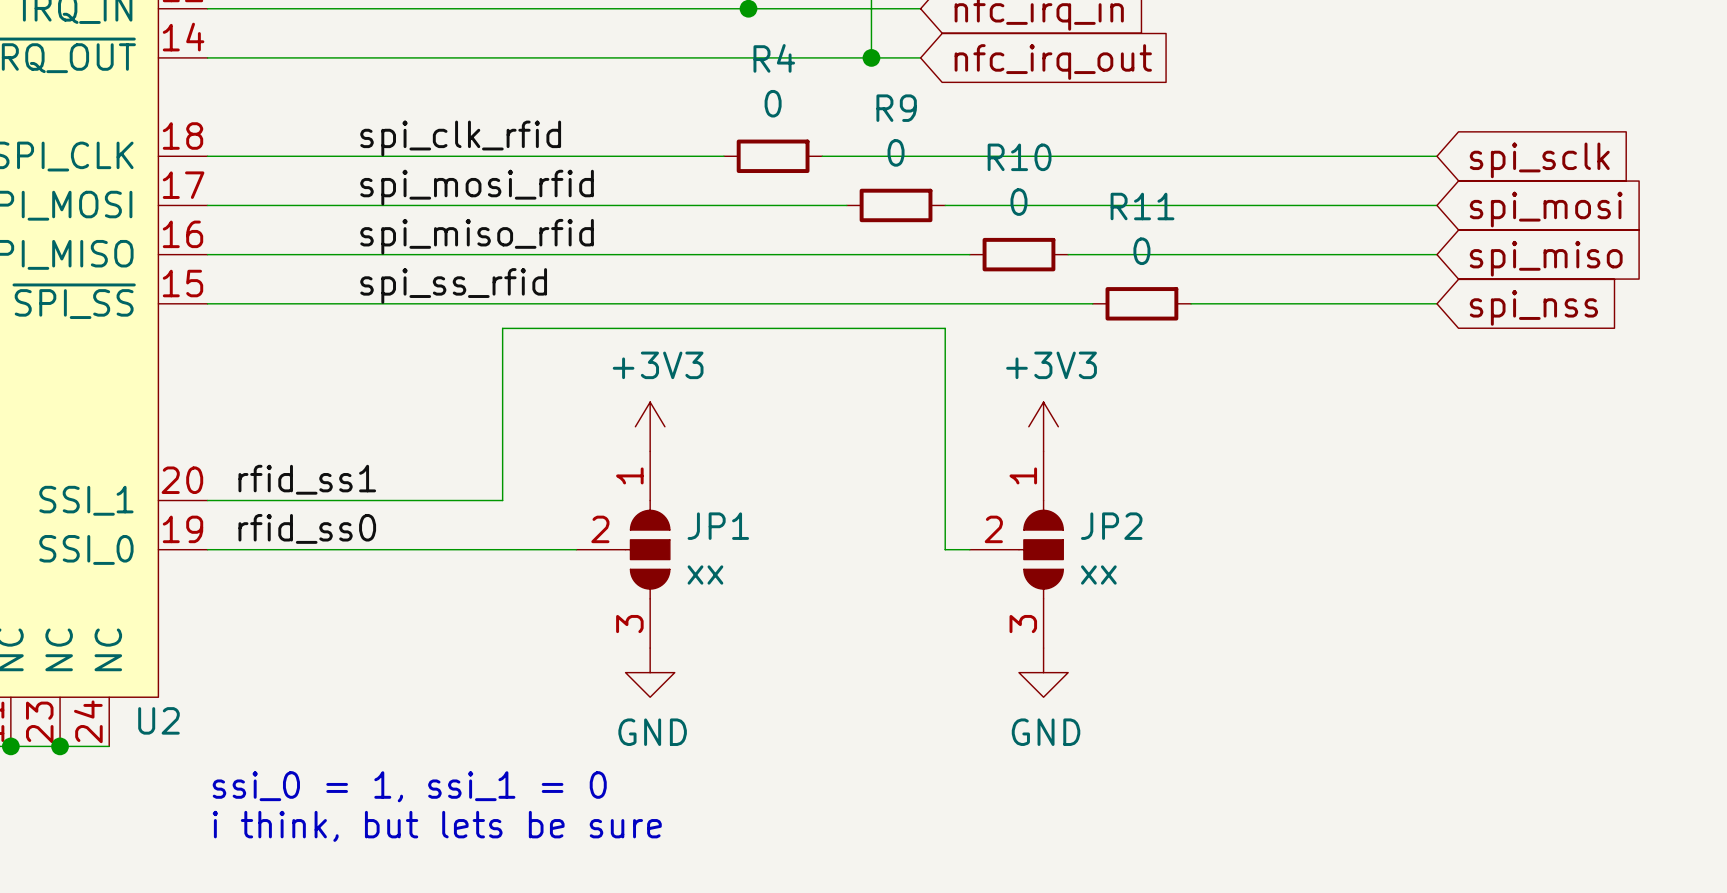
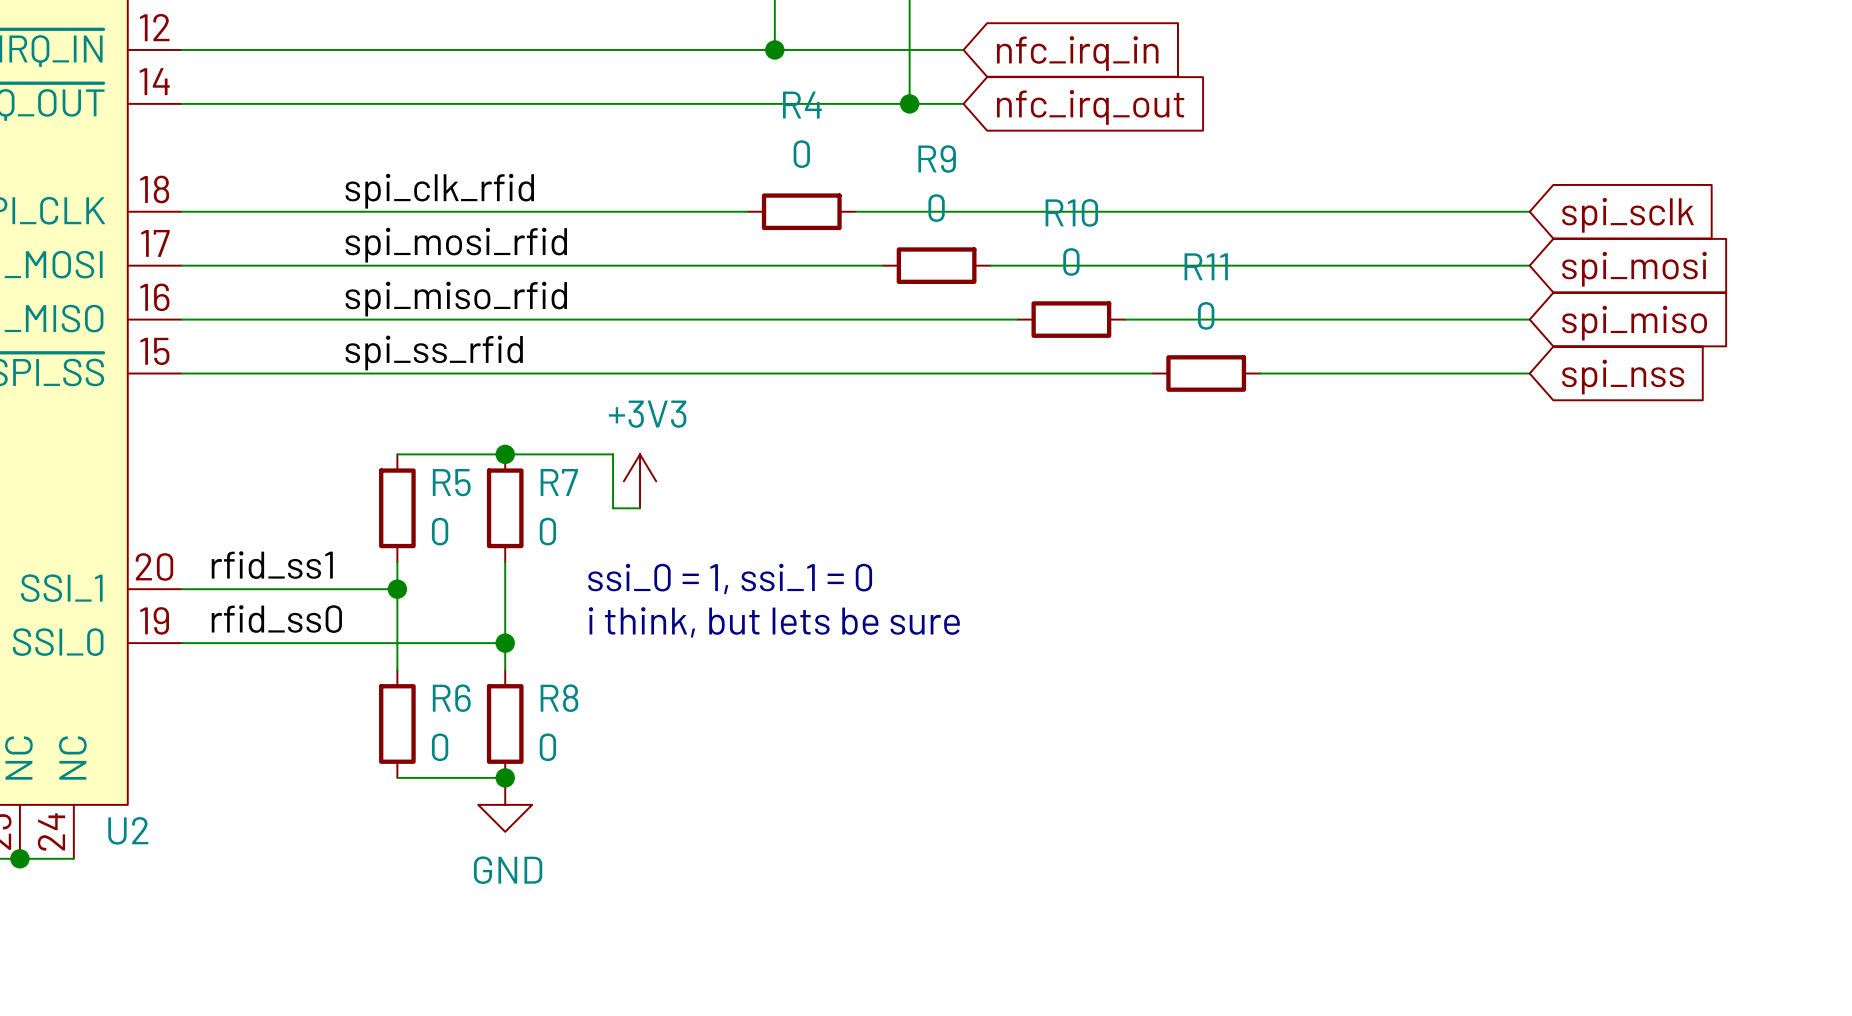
wire: none -> (397, 454) (613, 454) (613, 508) (640, 508)
junction: none -> (505, 454)
R5: none -> 0 (397, 508)
R7: none -> 0 (505, 508)
power symbol position: +3V3 (650, 426) -> +3V3 (640, 481)
power symbol: +3V3 (1043, 426) -> none
wire: none -> (397, 562) (397, 670)
wire: (502, 475) (502, 328) (945, 328) (945, 549) (969, 549) -> none
wire: (404, 500) (502, 500) -> (505, 670) (505, 589)
junction: none -> (397, 589)
wire: (502, 549) (576, 549) -> none
junction: none -> (505, 643)
JP1: xx (623, 549) -> none
JP2: xx (1016, 549) -> none
R6: none -> 0 (397, 723)
R8: none -> 0 (505, 723)
wire: none -> (397, 777) (505, 777)
junction: none -> (505, 777)
power symbol position: GND (650, 672) -> GND (505, 804)
power symbol: GND (1043, 672) -> none
text position: ssi_0 = 1, ssi_1 = 0 (409, 786) -> ssi_0 = 1, ssi_1 = 0 (730, 578)
text position: i think, but lets be sure (437, 826) -> i think, but lets be sure (774, 622)

